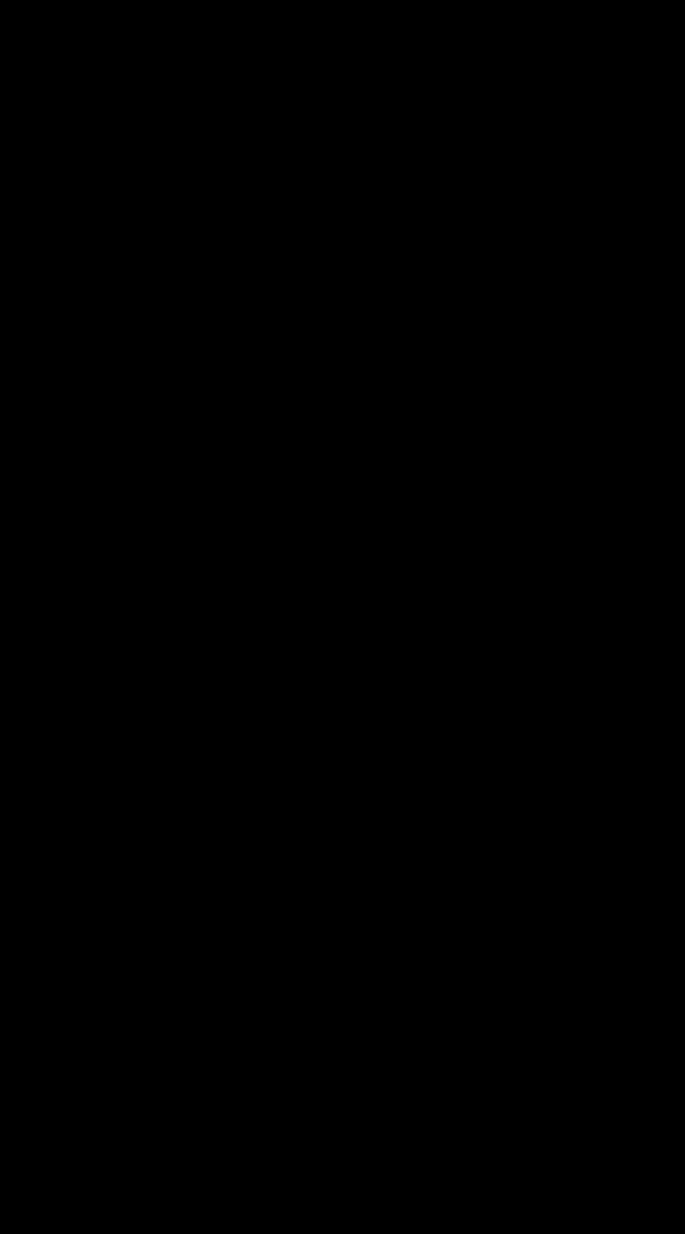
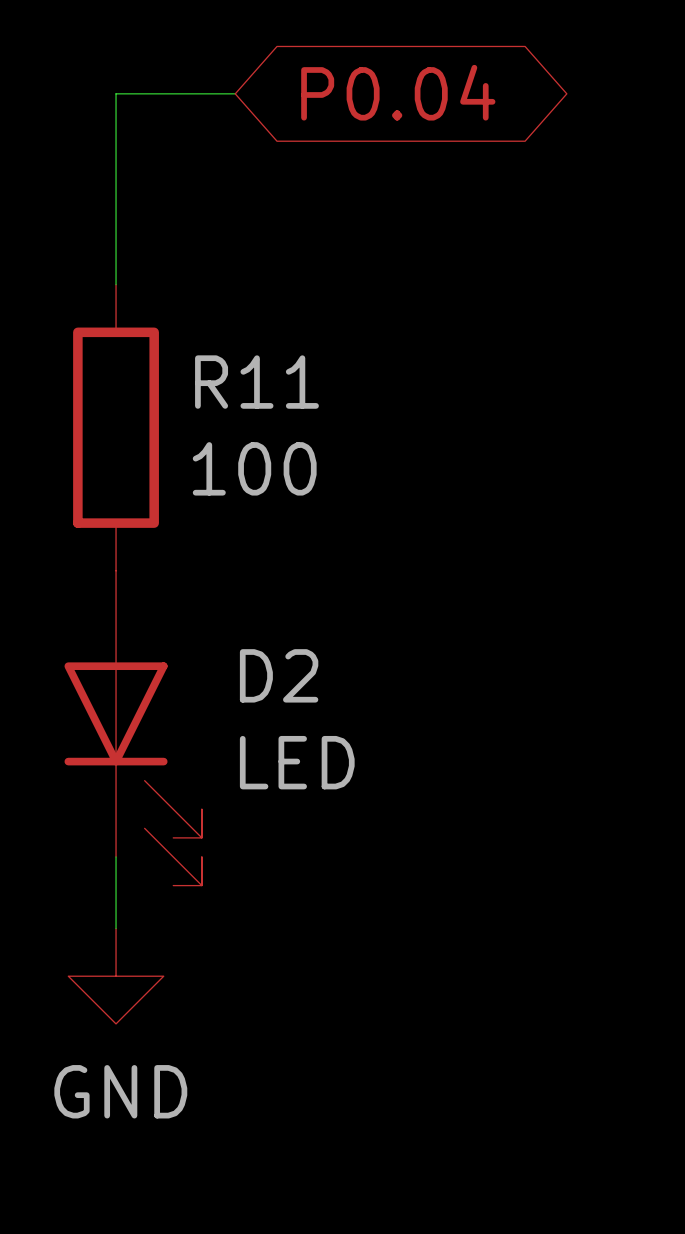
global label: none -> P0.04 (398, 92)
wire: none -> (235, 93) (116, 93) (116, 284)
R11: none -> 100 (116, 427)
D2: none -> LED (133, 728)
wire: none -> (116, 856) (116, 928)
power symbol: none -> GND (116, 976)

